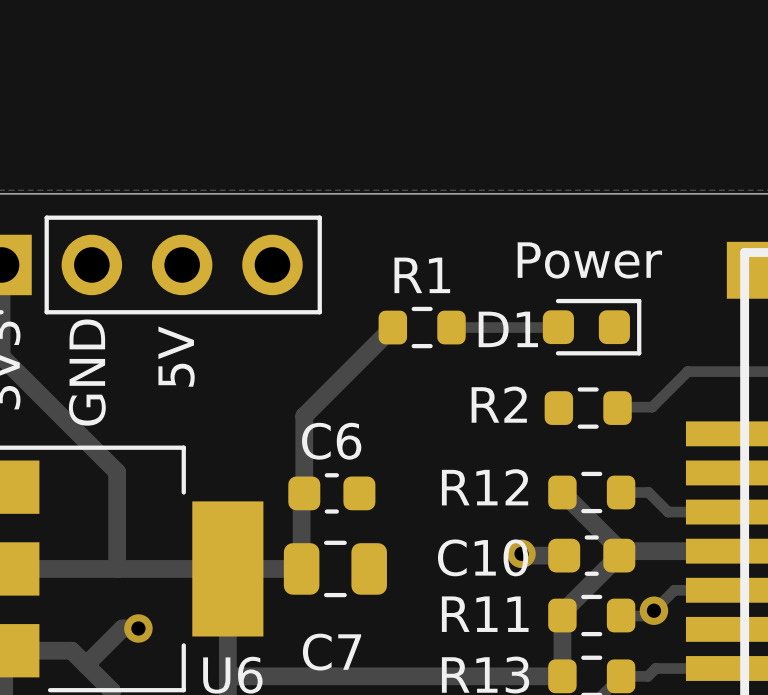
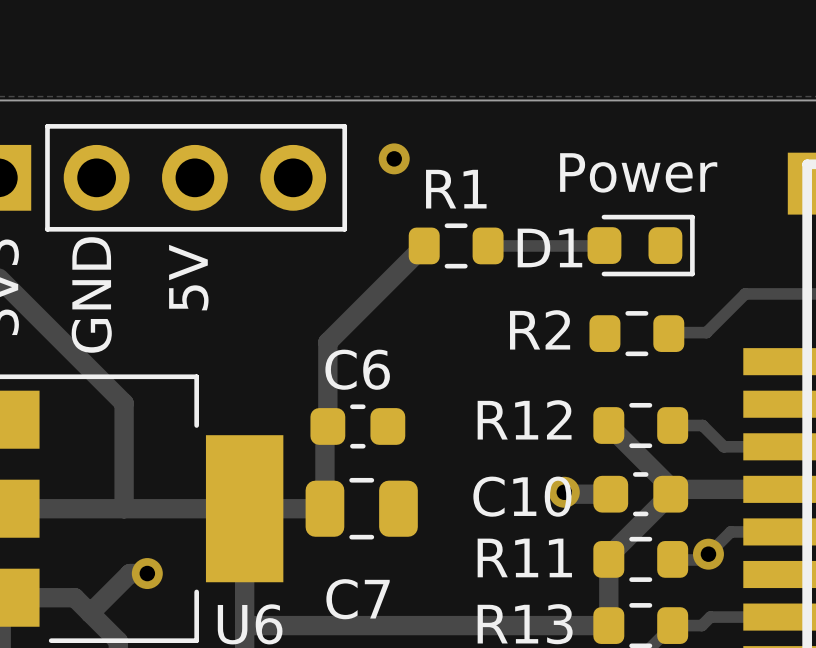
via: none -> (394, 158)

